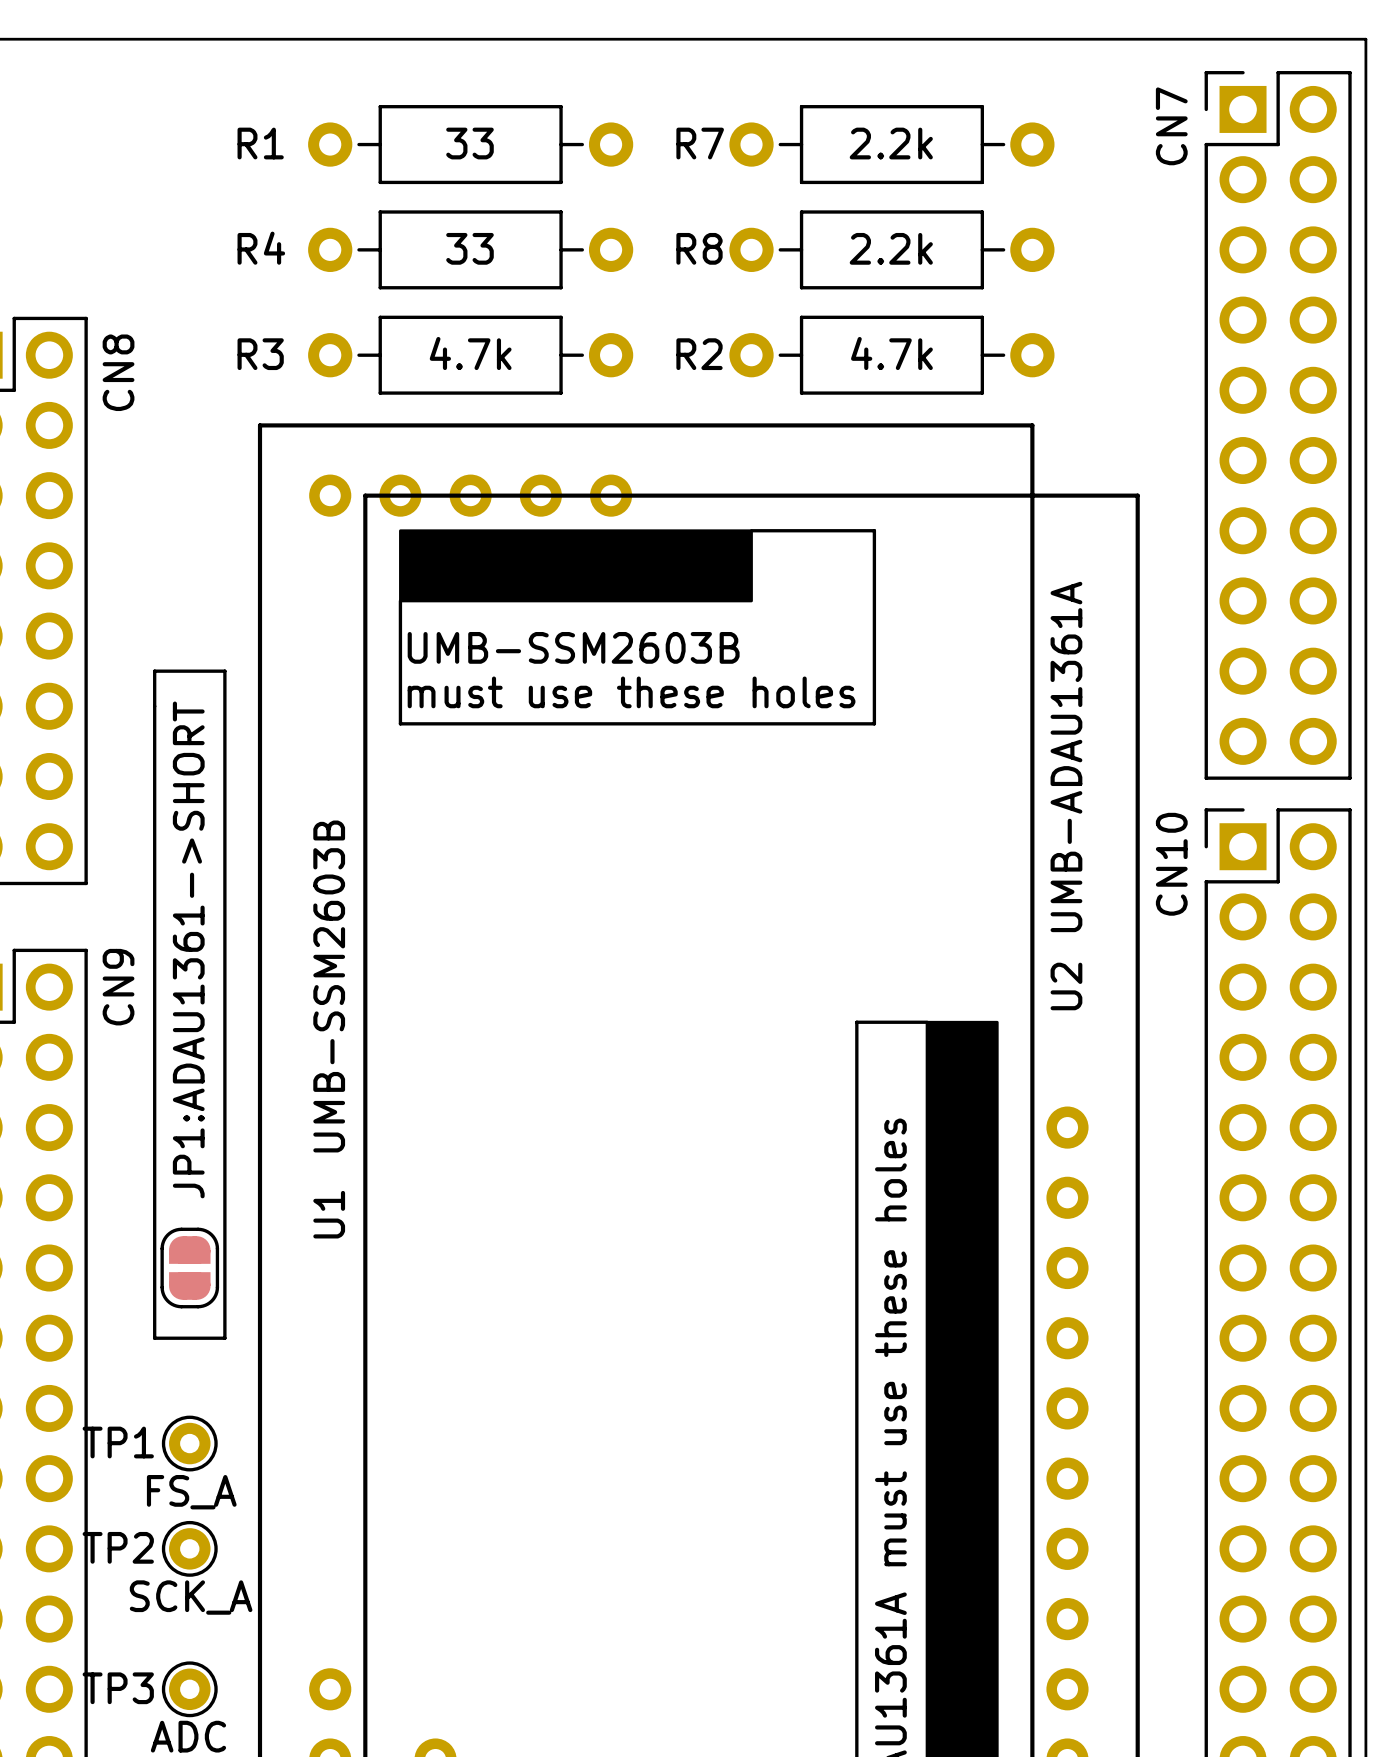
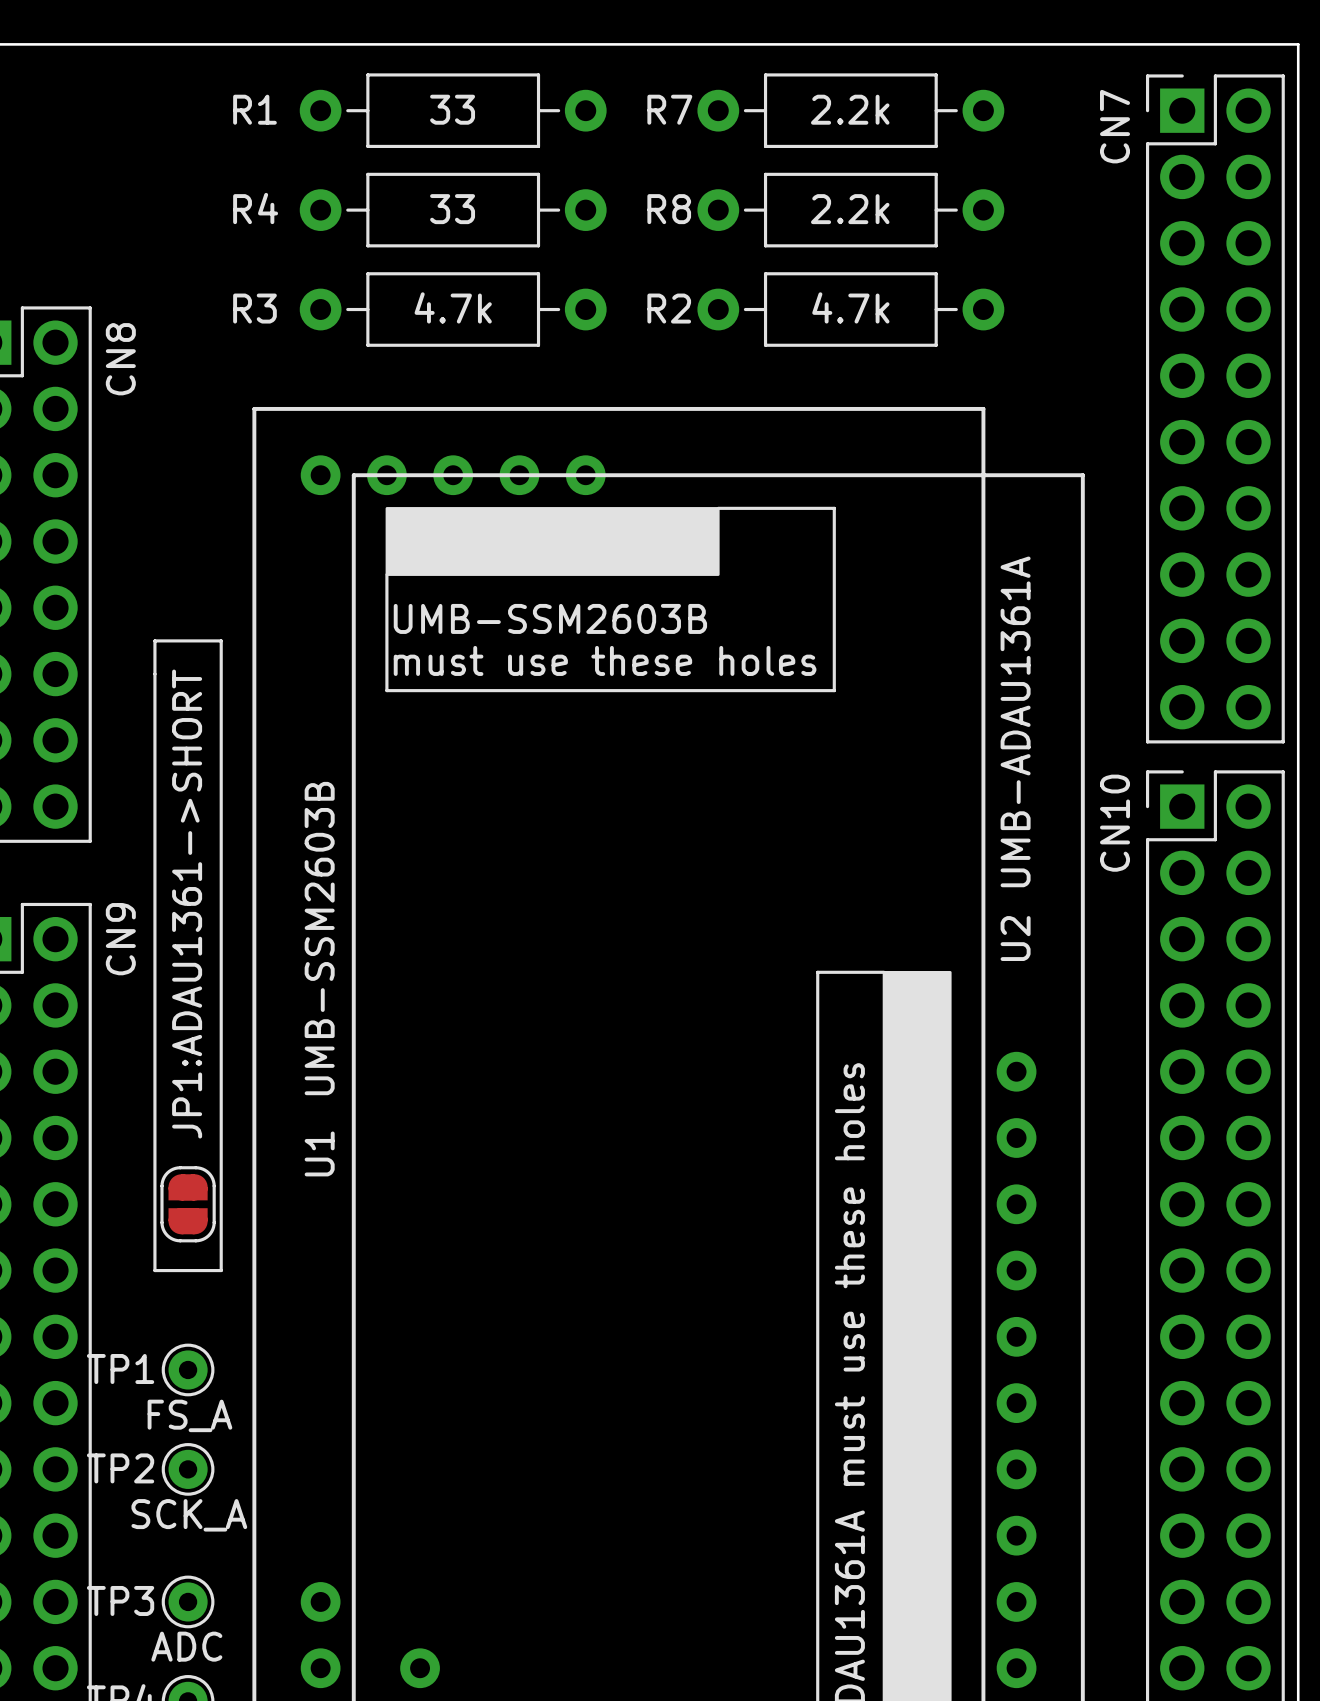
R1 position: (470, 144) -> (453, 110)
R7 position: (891, 144) -> (850, 110)
R4 position: (470, 249) -> (453, 210)
R8 position: (891, 249) -> (850, 210)
R3 position: (470, 355) -> (453, 309)
R2 position: (891, 355) -> (850, 309)

